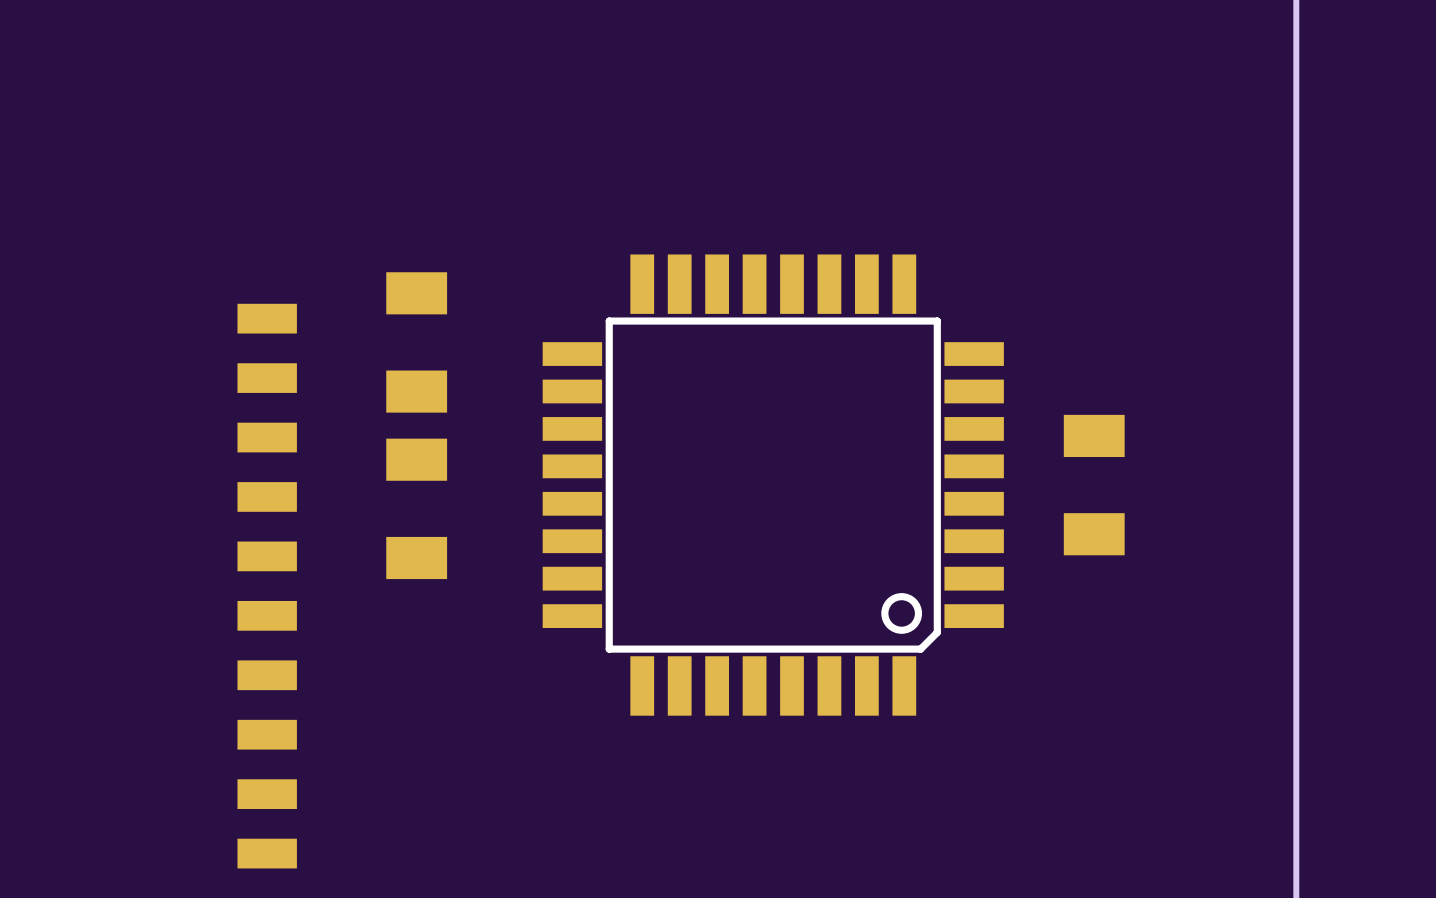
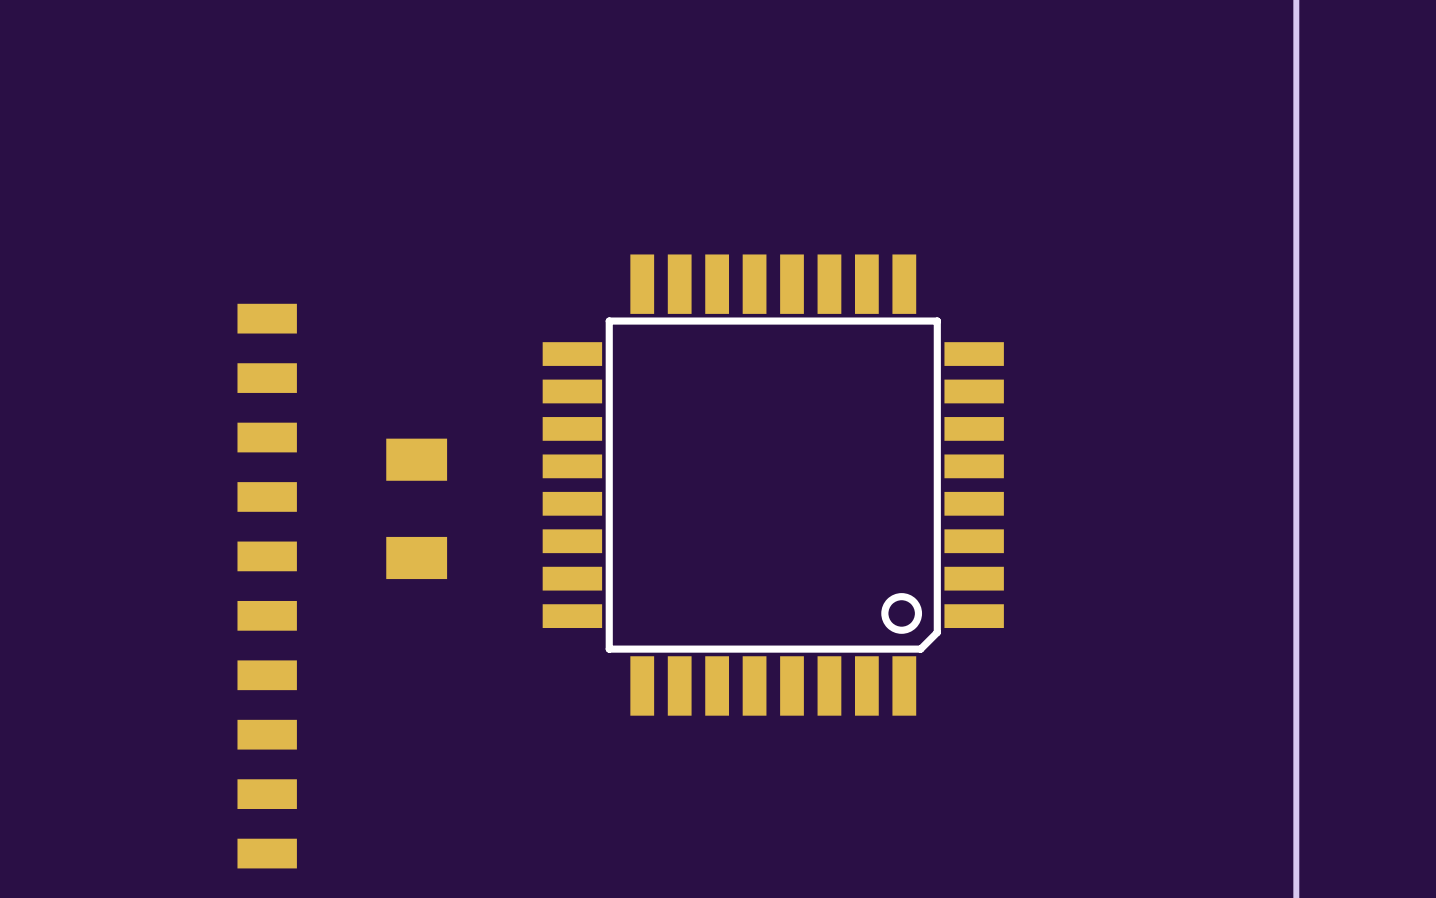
part: (416, 342) -> none
part: (1094, 485) -> none

